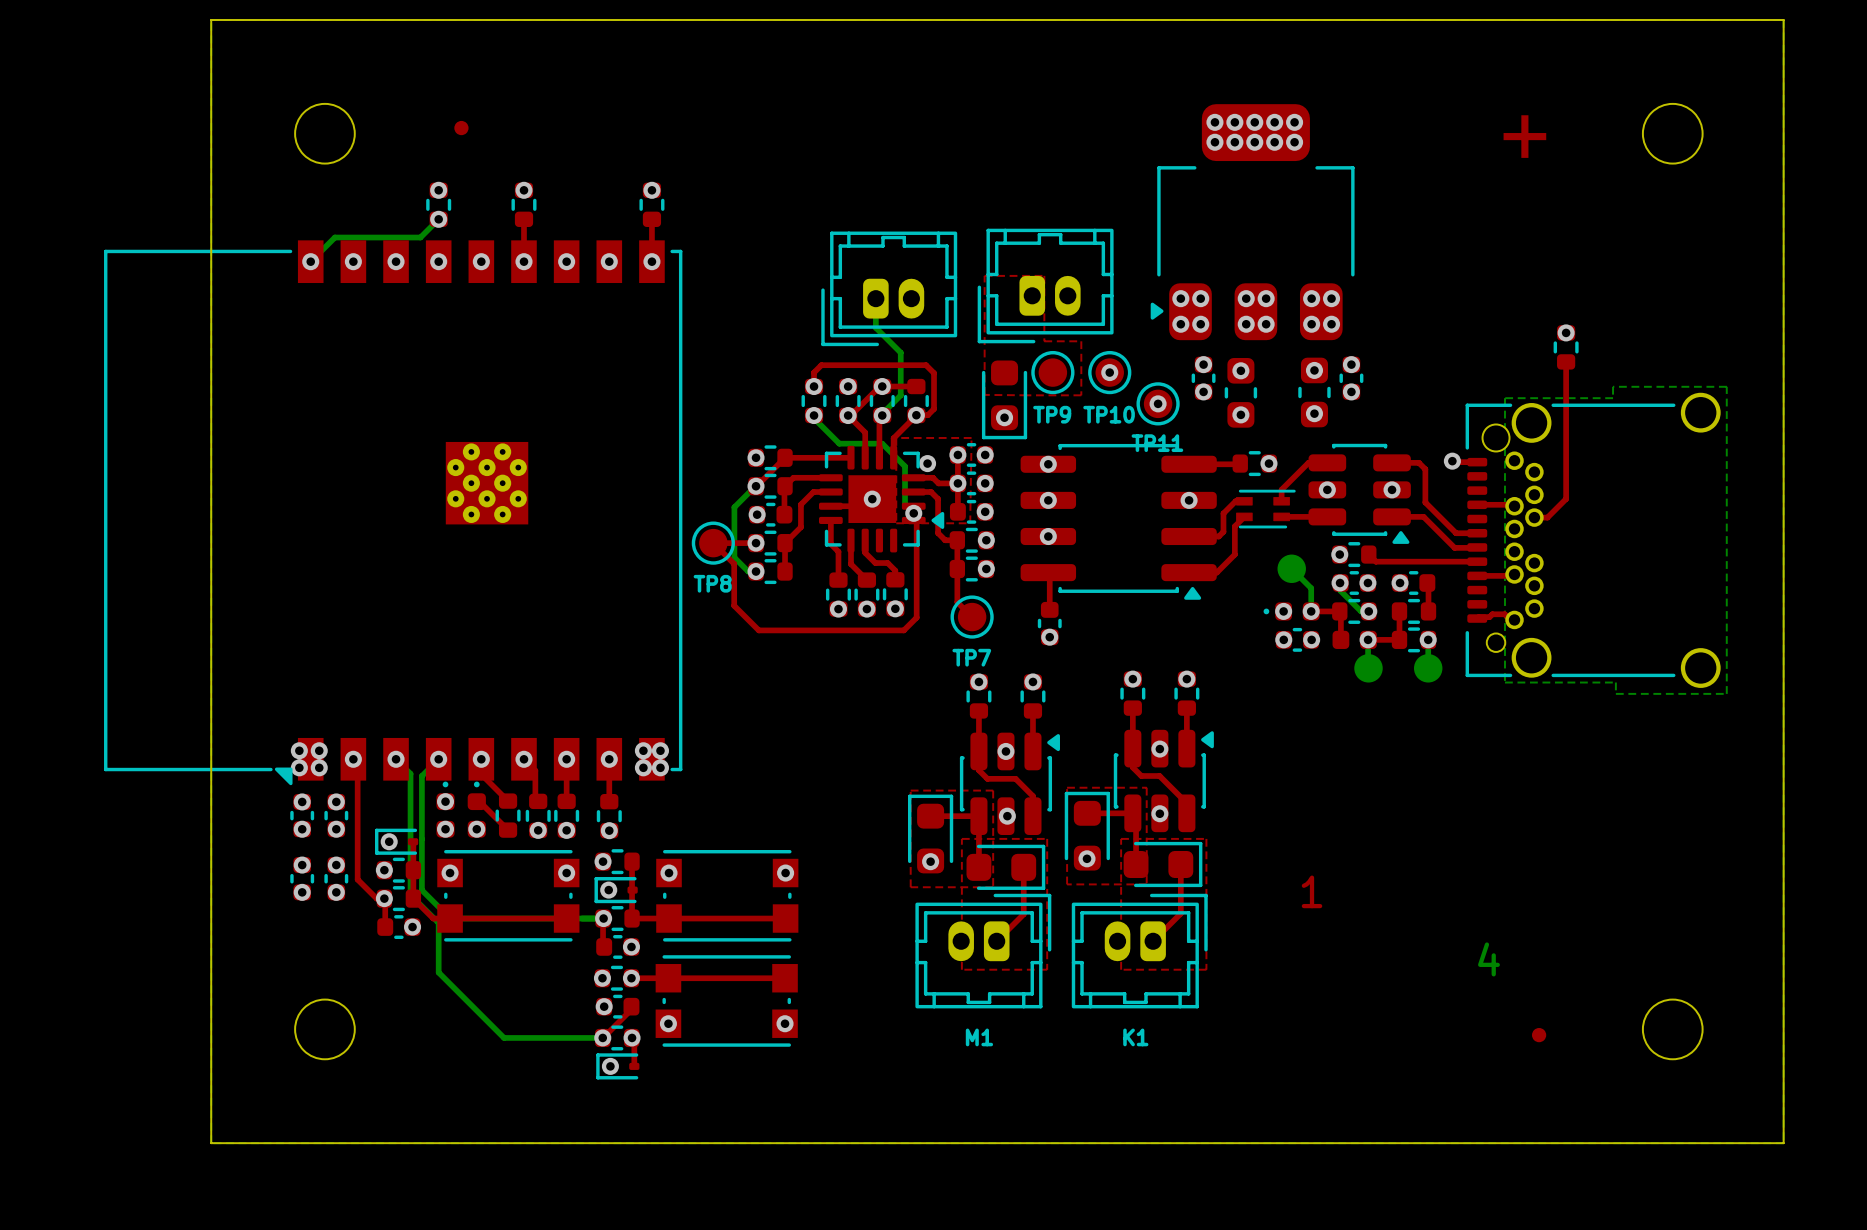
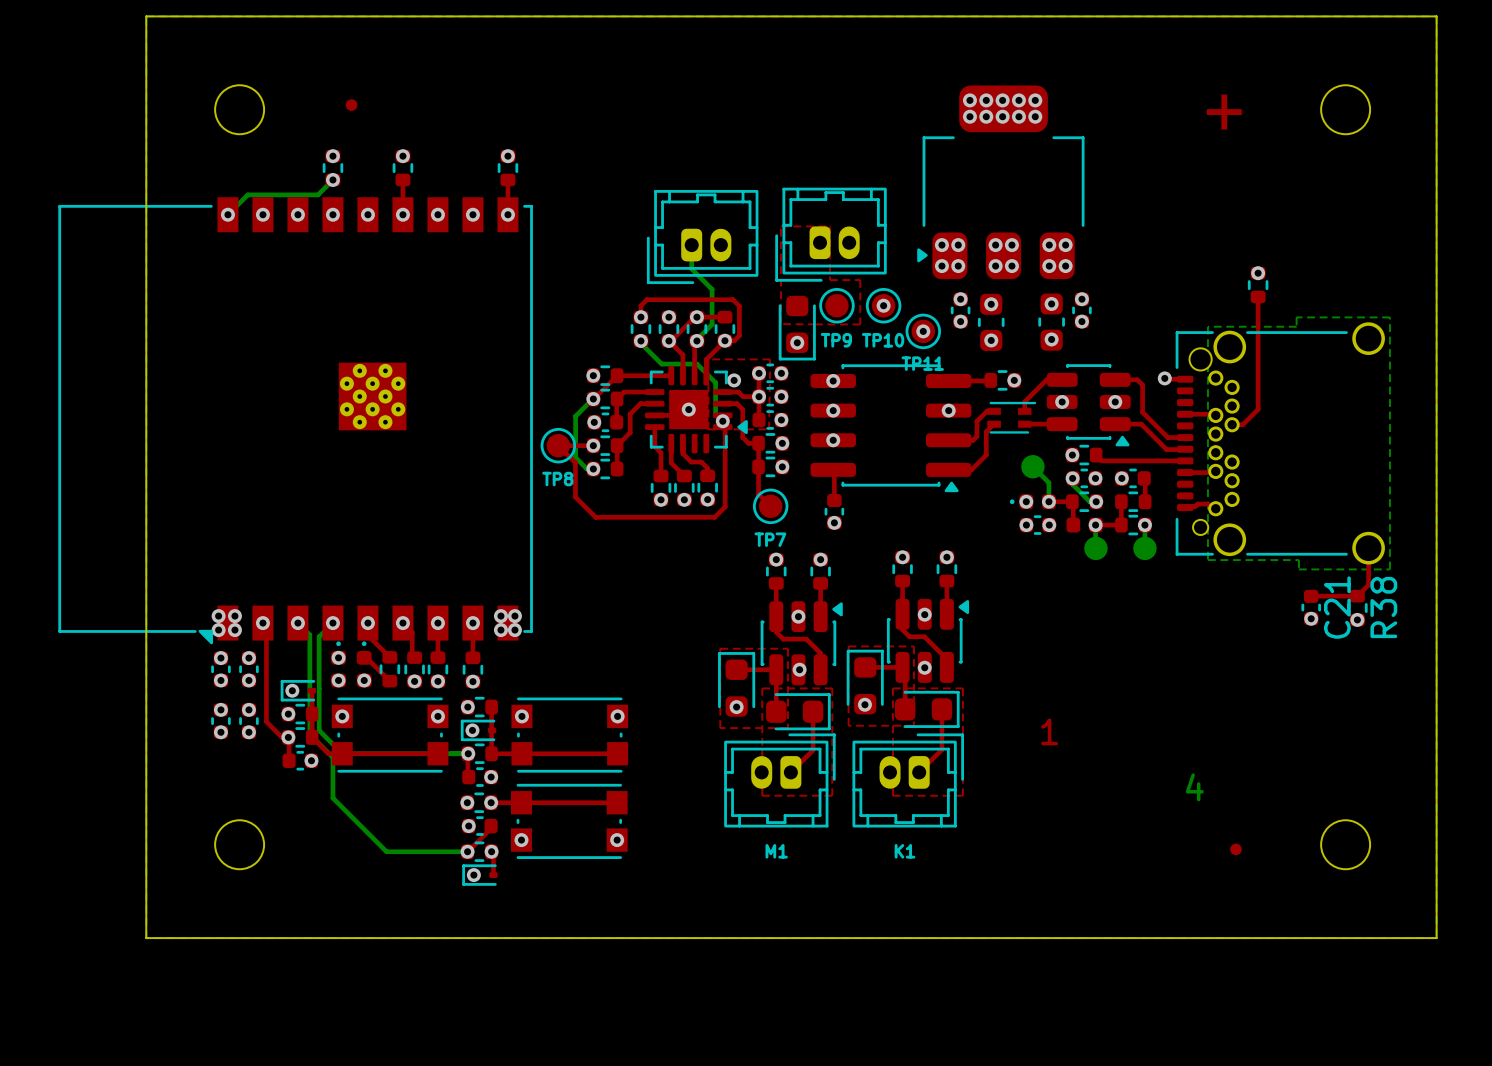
top track: none -> (1368, 548) (1368, 584) (1357, 596) (1311, 596)
C21: none -> (1311, 607)
R38: none -> (1357, 608)
via: none -> (1311, 618)
via: none -> (1357, 619)

